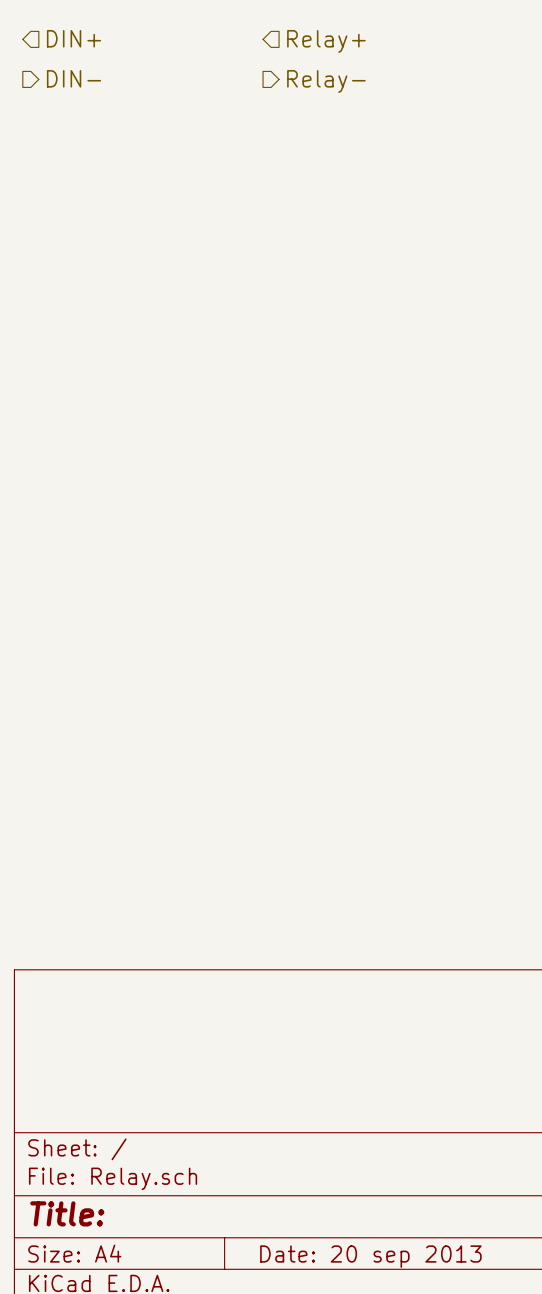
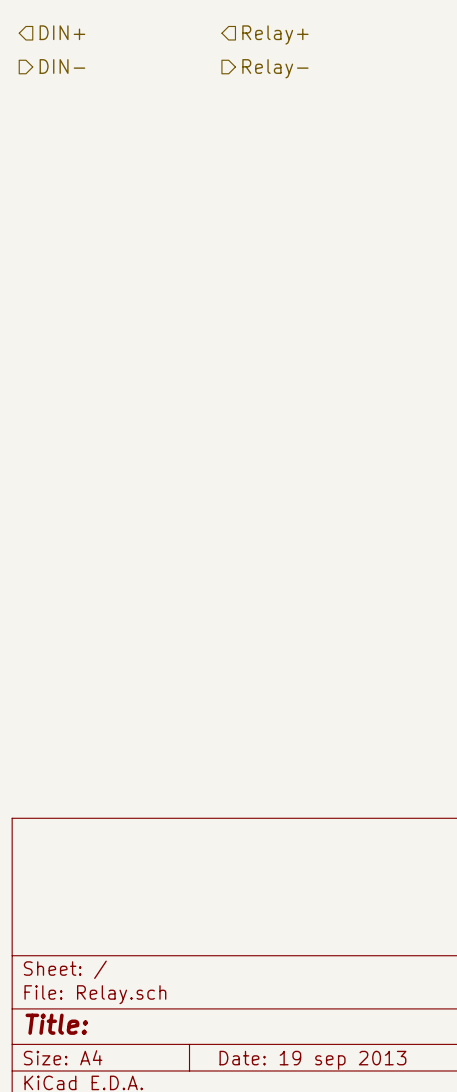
title block: Date: 20 sep 2013 (370, 1256) -> Date: 19 sep 2013 (312, 1060)

